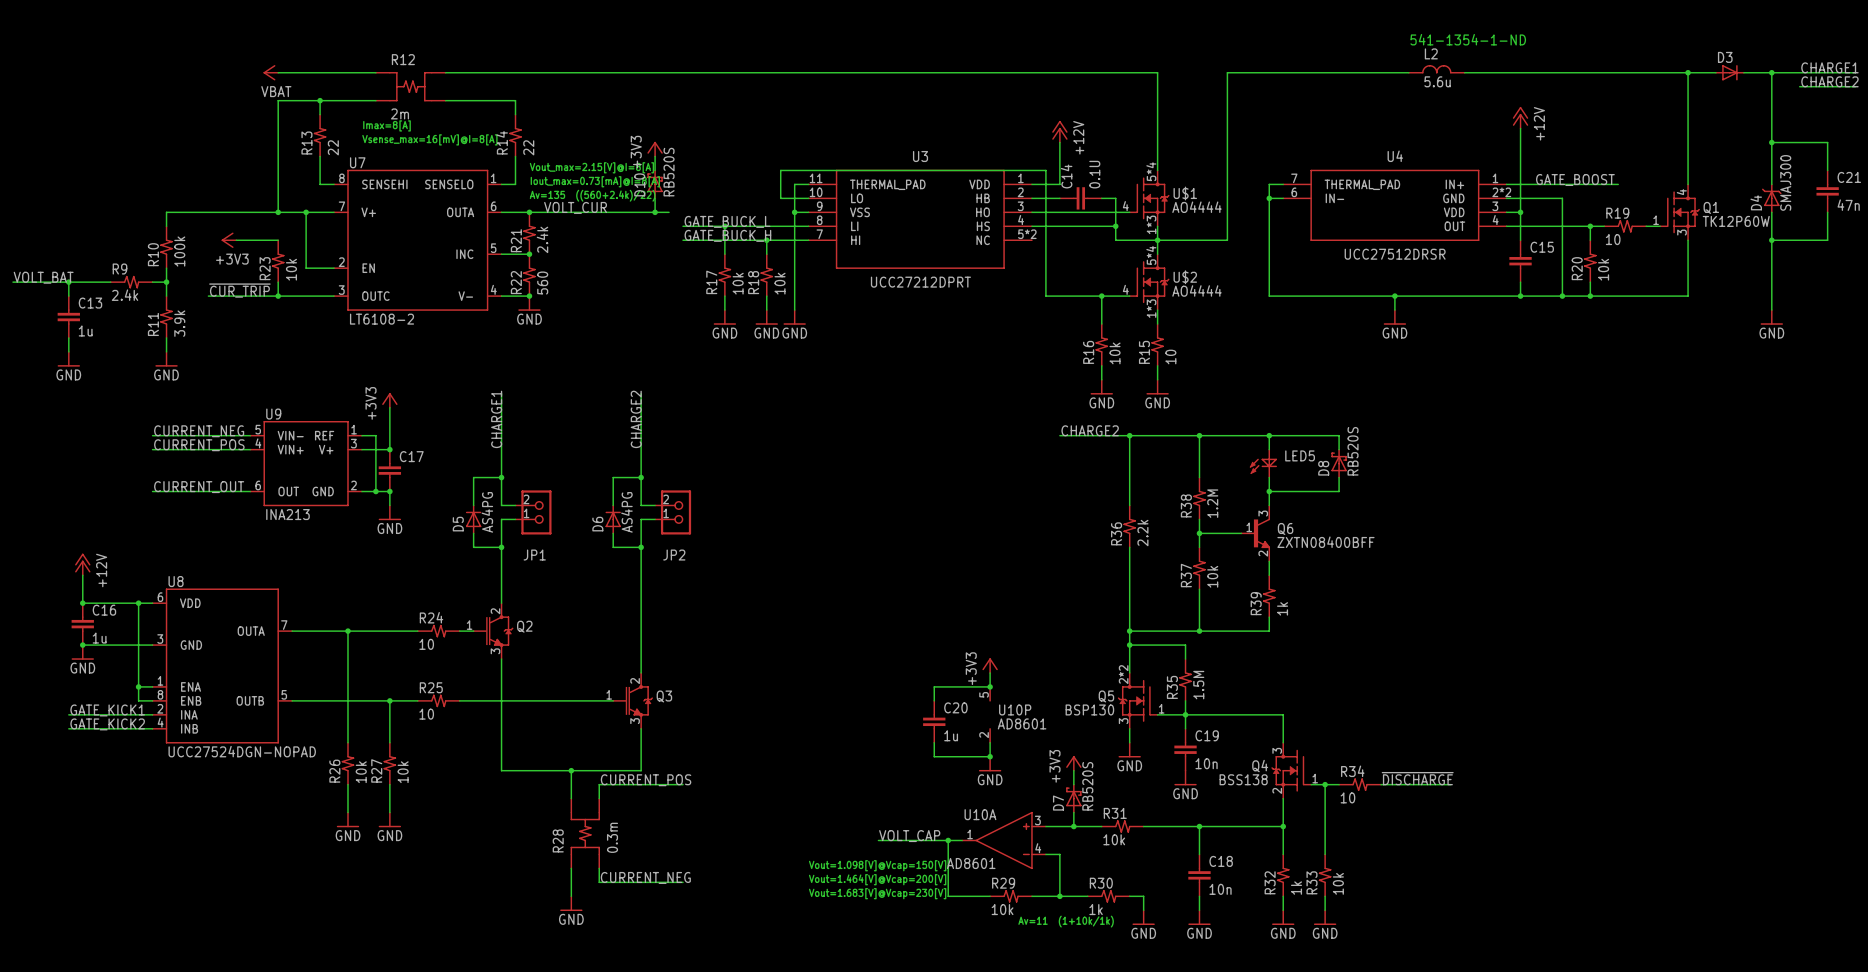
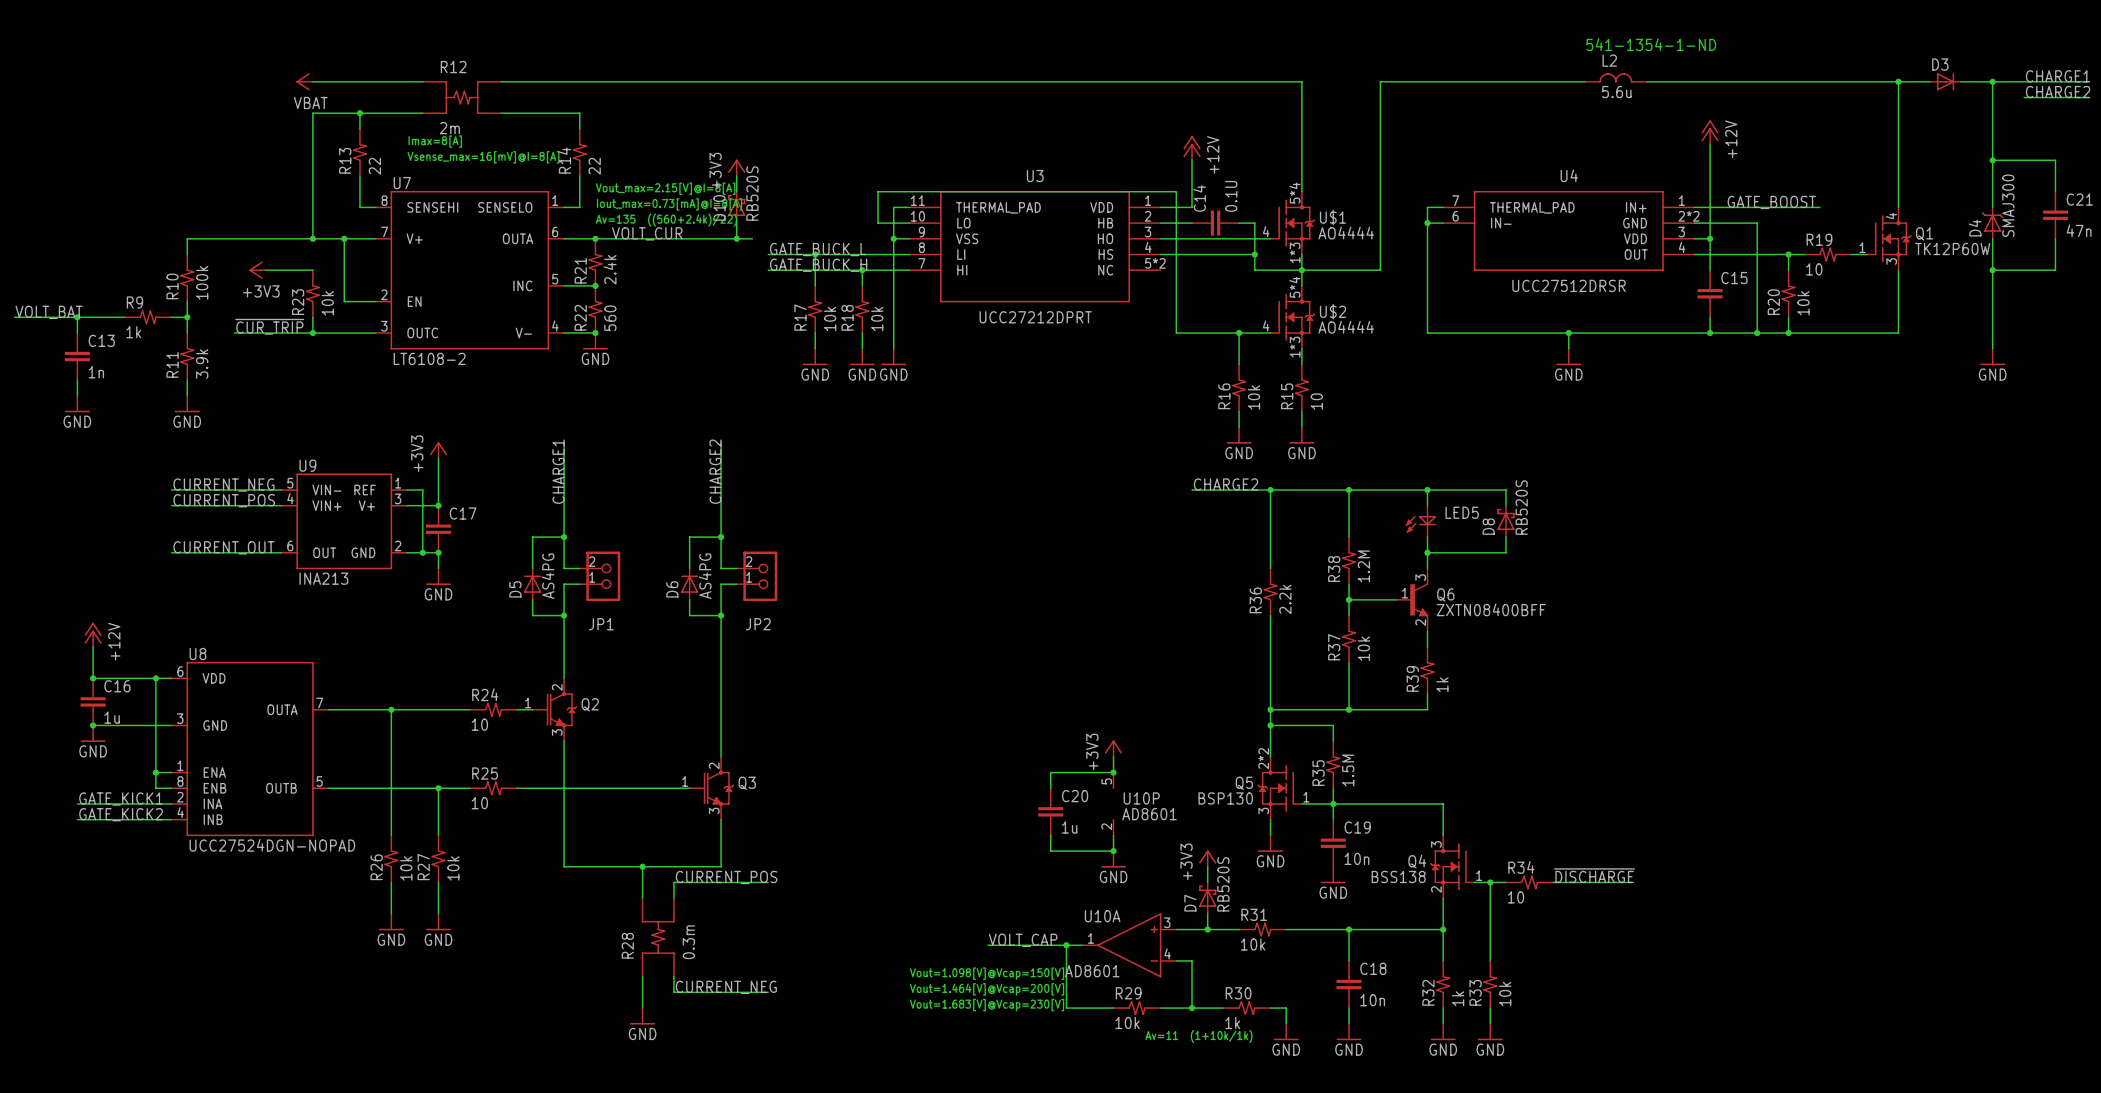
R9 value: 2.4k (125, 295) -> 1k (133, 332)
C13 value: 1u (85, 330) -> 1n (96, 372)

